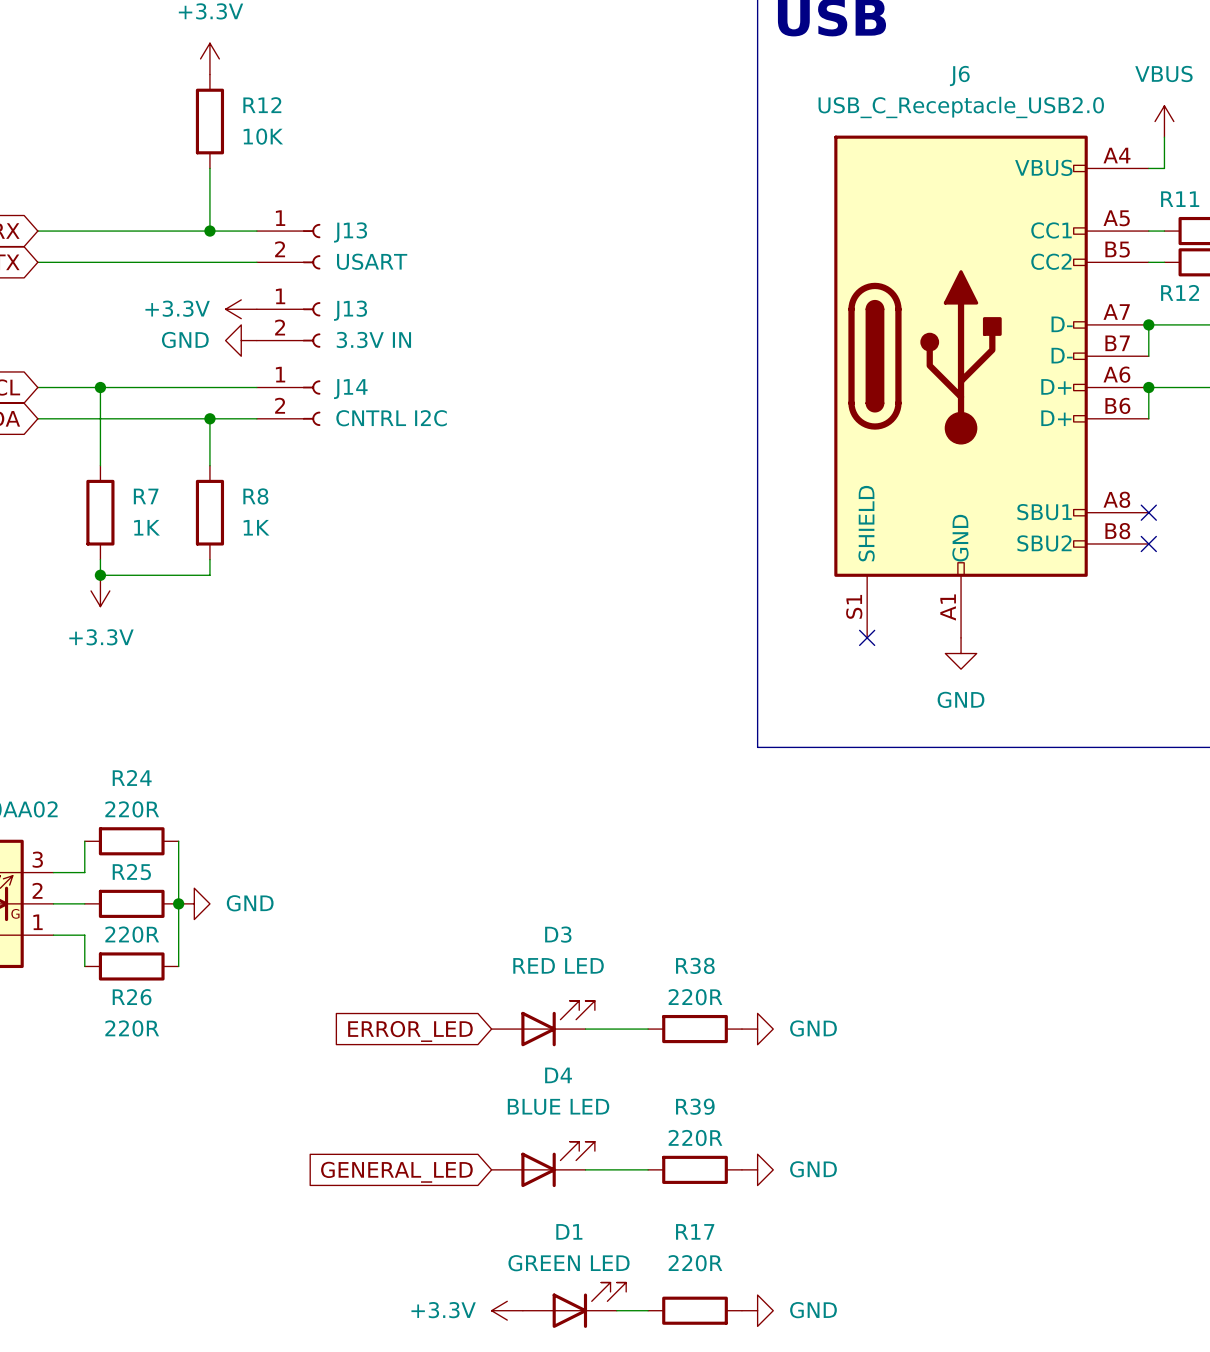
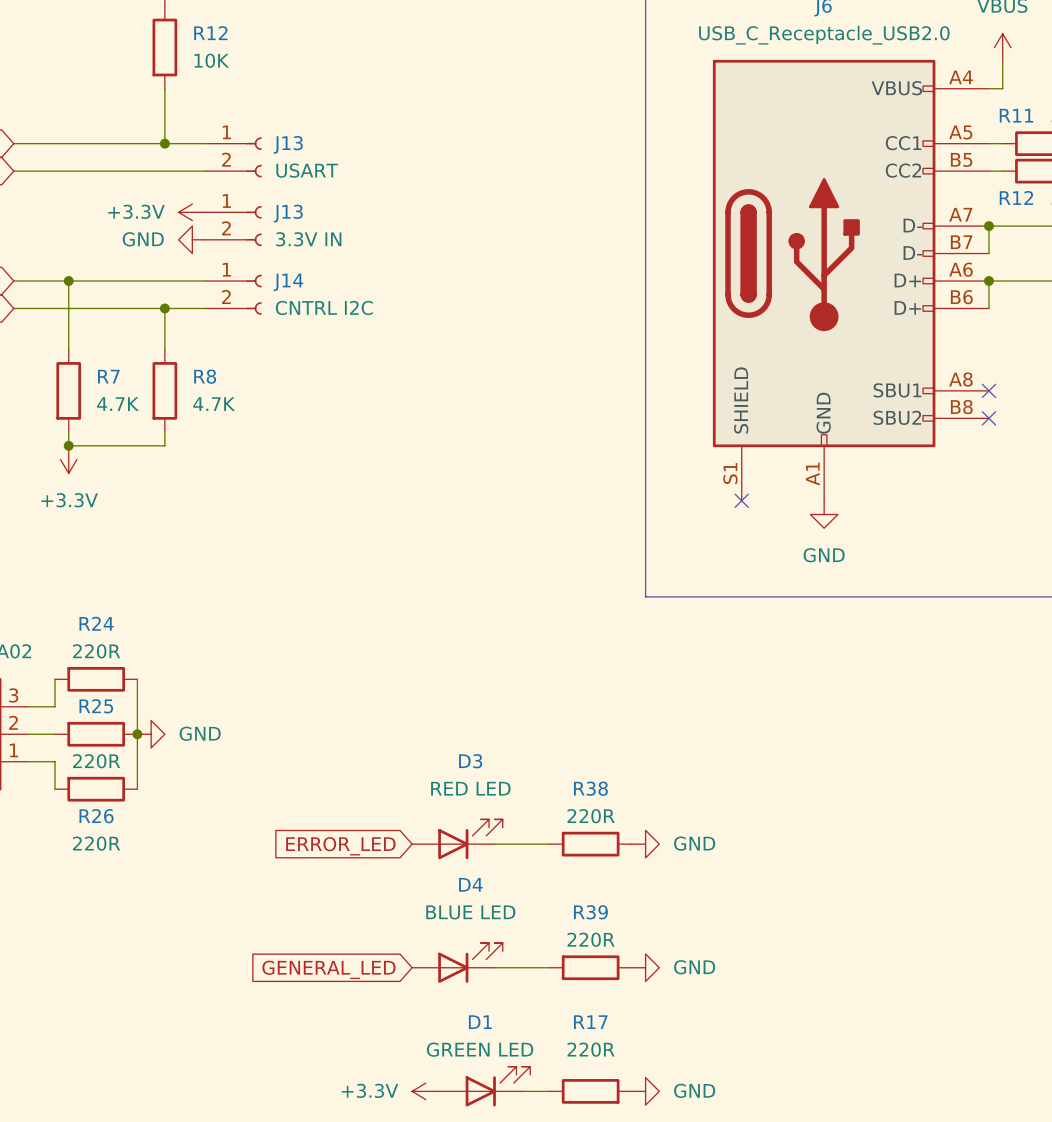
R7 value: 1K (146, 527) -> 4.7K (118, 404)
R8 value: 1K (256, 527) -> 4.7K (214, 404)

